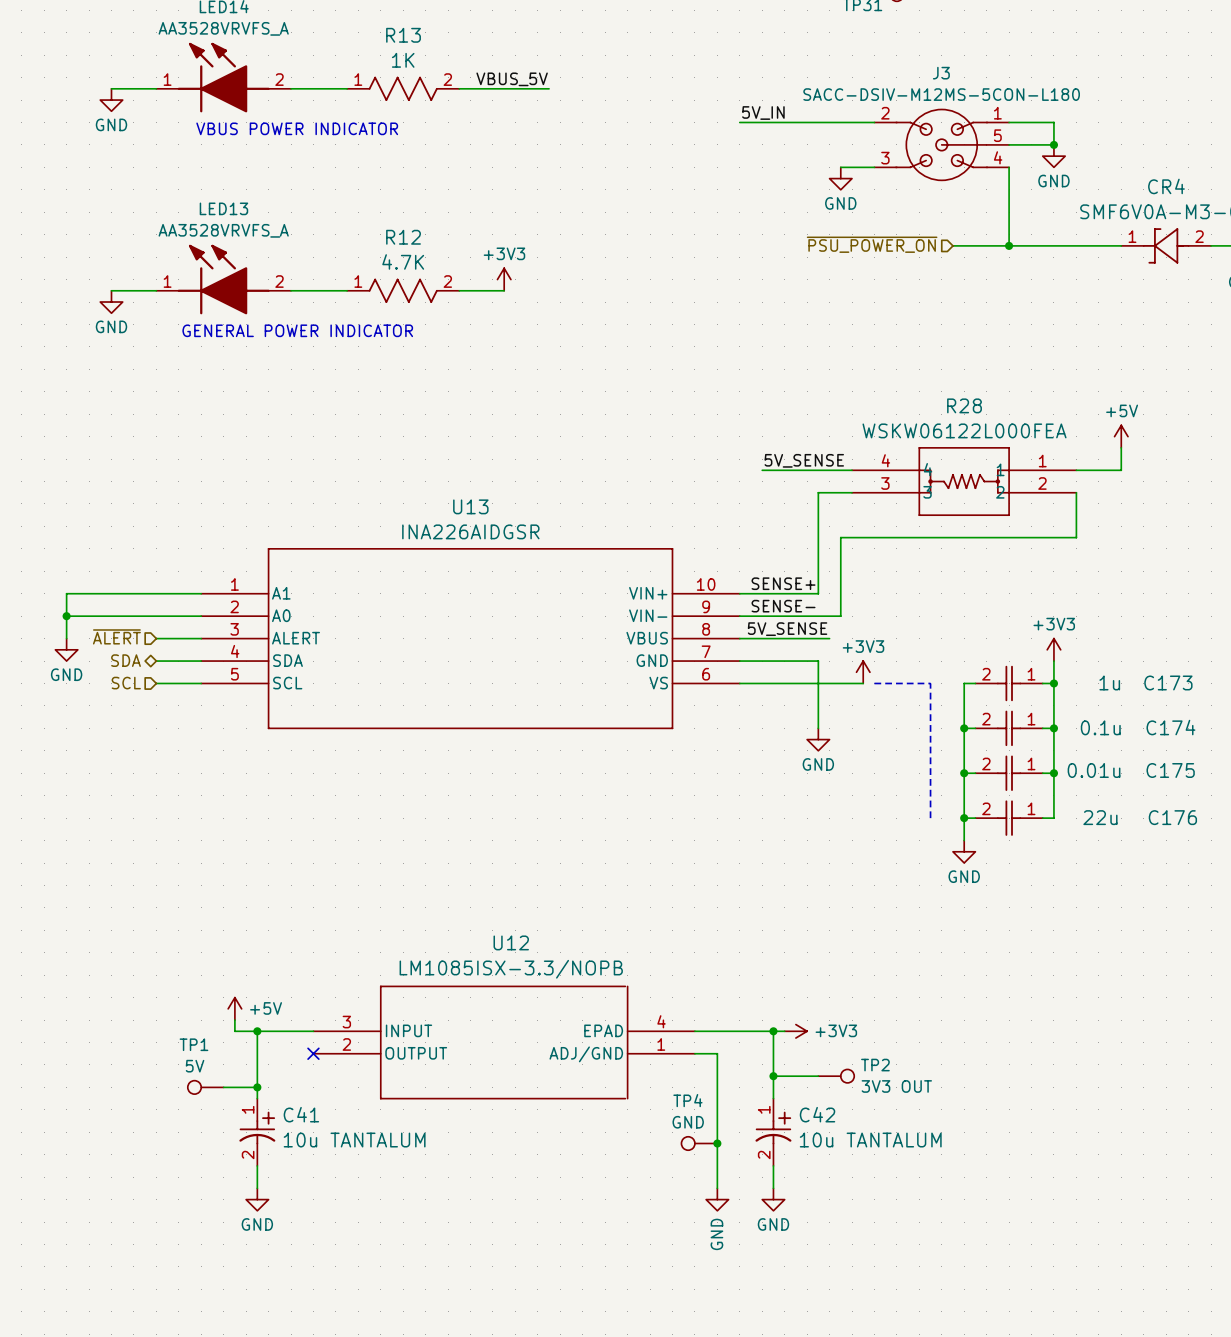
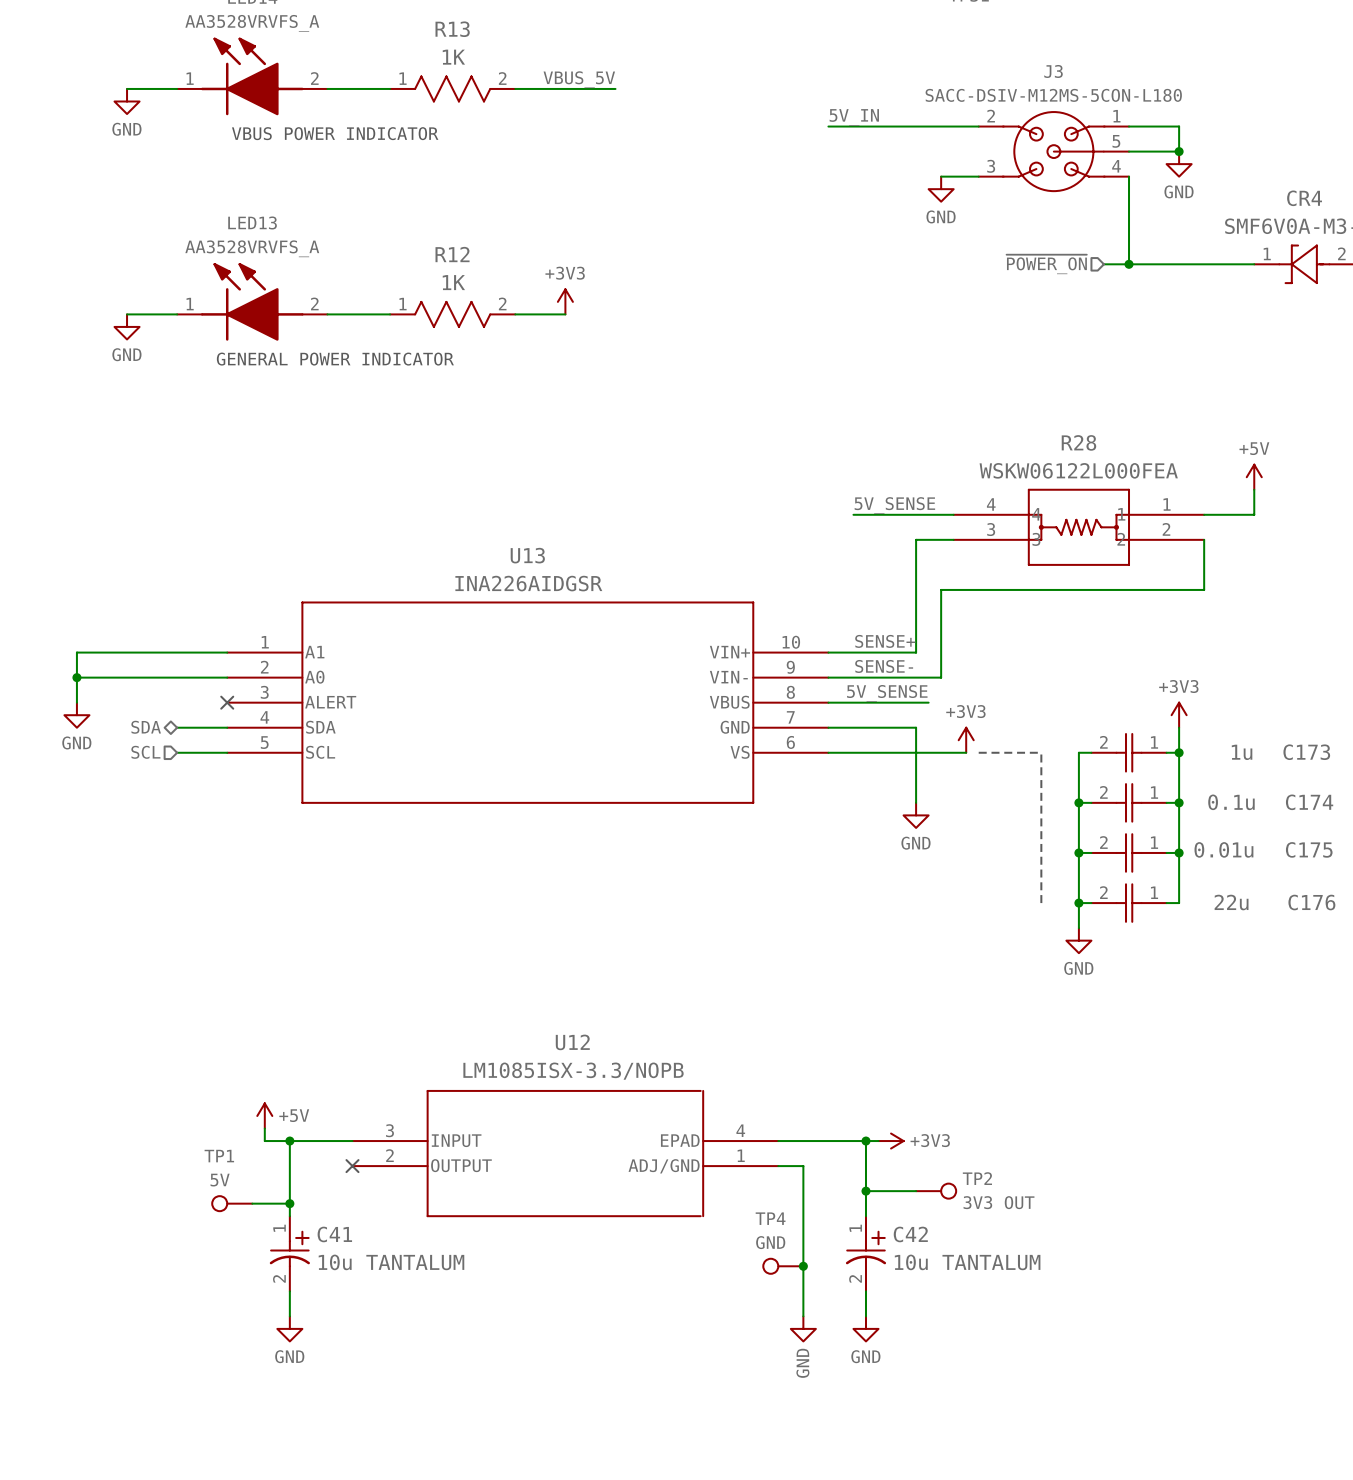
hierarchical label: ~{PSU_POWER_ON} (872, 244) -> ~{POWER_ON} (1046, 264)
wire: (952, 245) (986, 245) -> none
R12 value: 4.7K (403, 261) -> 1K (453, 282)
hierarchical label: ~{ALERT} (116, 636) -> none
wire: (156, 638) (201, 638) -> none
no-connect mark: none -> (227, 702)

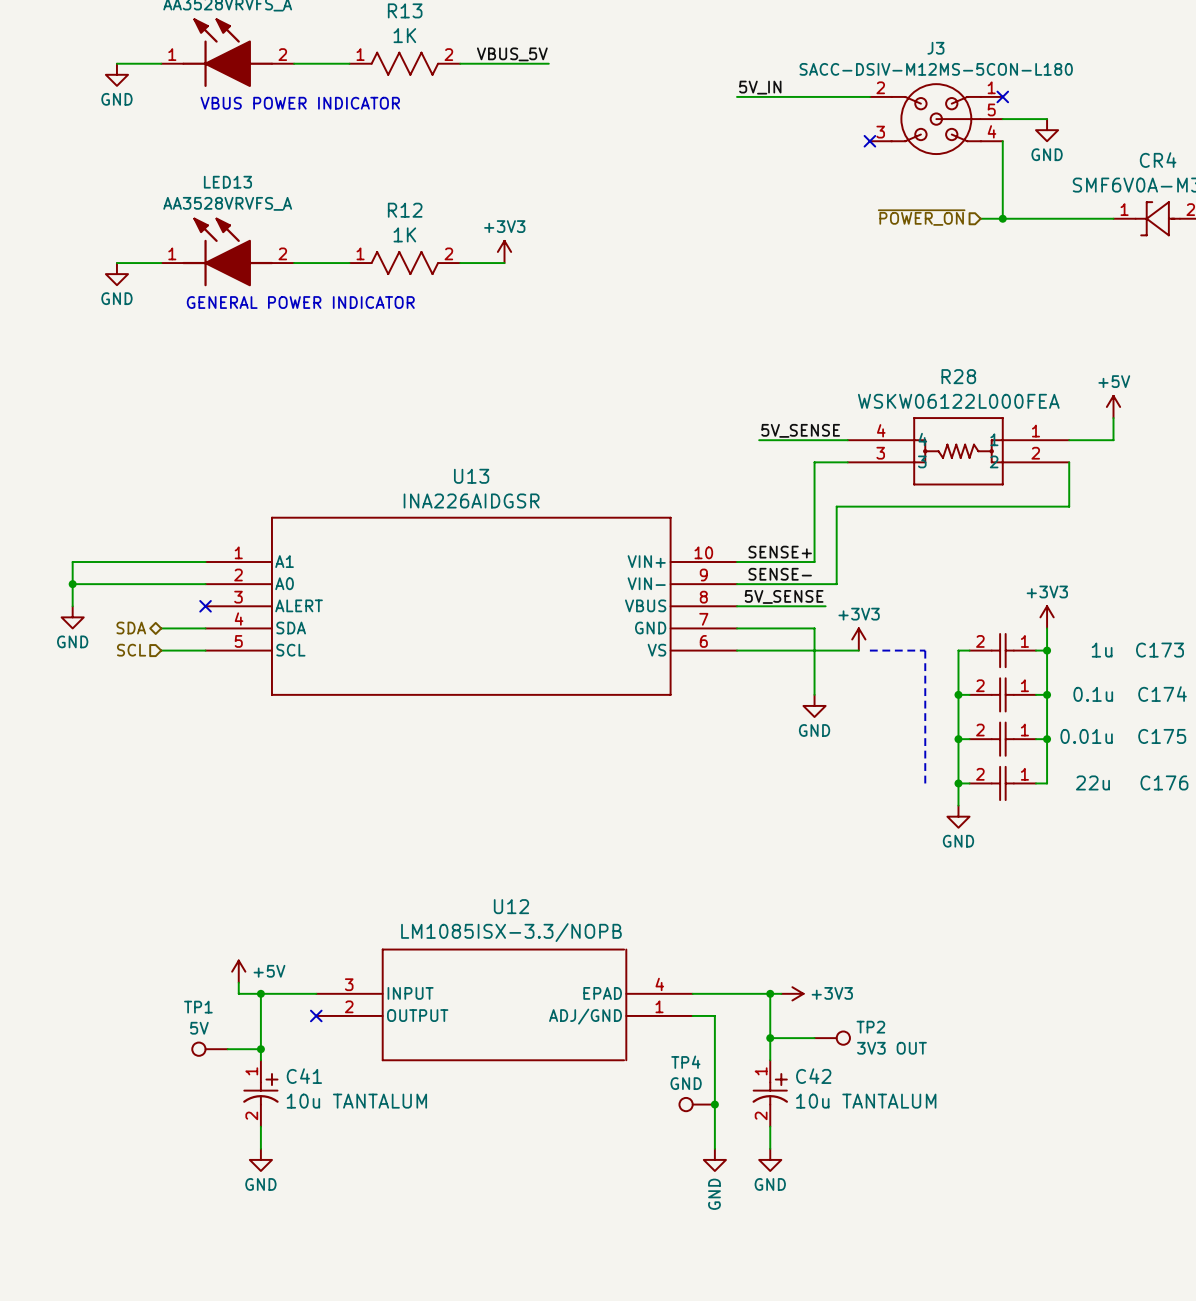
wire: (1129, 126) (1179, 126) (1179, 151) -> none
no-connect mark: none -> (1002, 96)
junction: (1179, 151) -> none
wire: (941, 176) (978, 176) -> none
no-connect mark: none -> (869, 141)
power symbol: GND (941, 189) -> none

